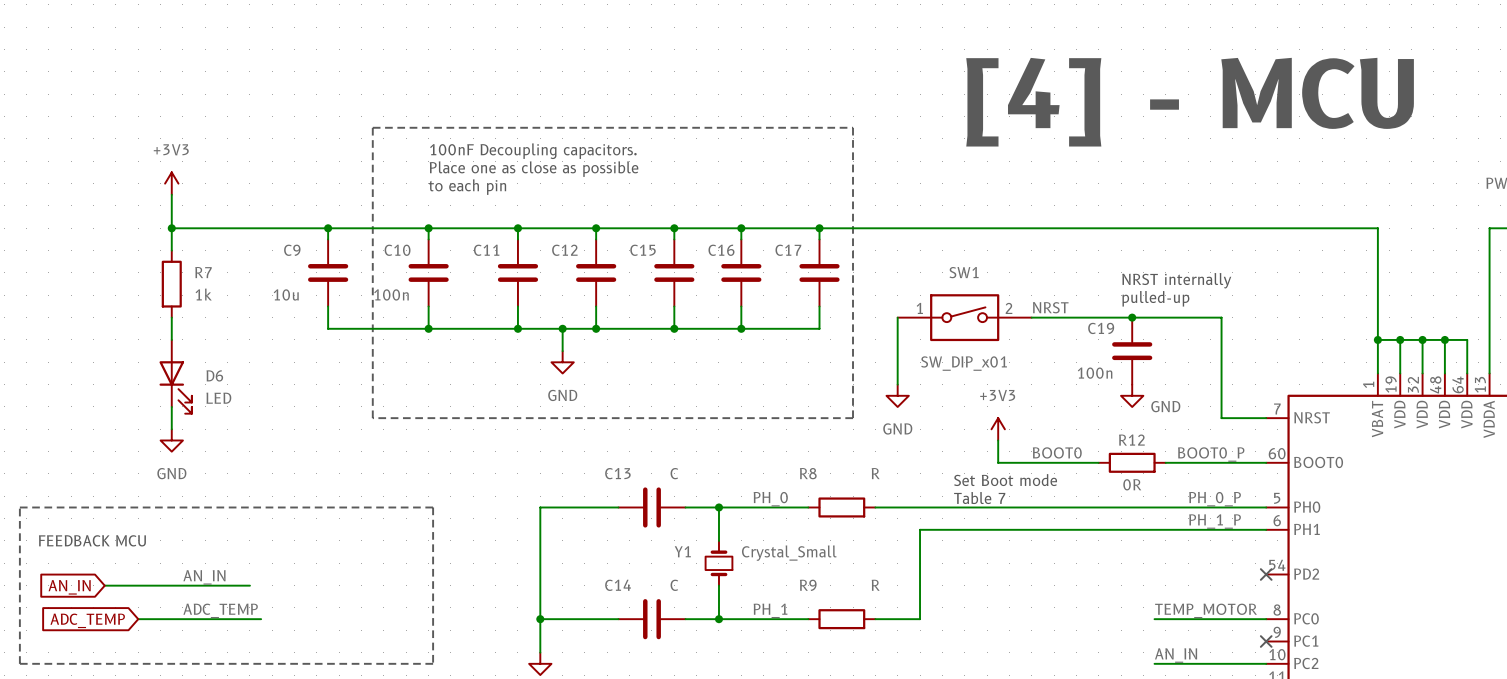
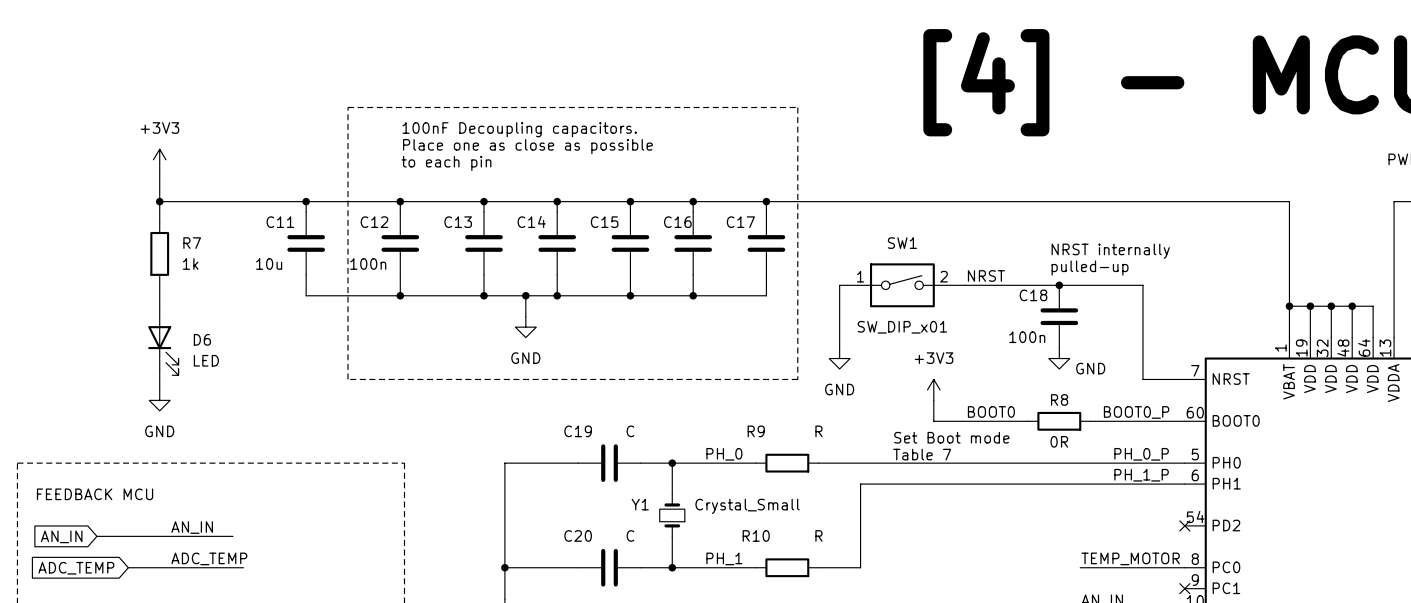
C9 name: C9 (292, 250) -> C11 (280, 222)
C10 name: C10 (397, 250) -> C12 (374, 222)
C11 name: C11 (486, 250) -> C13 (458, 222)
C12 name: C12 (564, 250) -> C14 (531, 221)
C19 name: C19 (1101, 328) -> C18 (1033, 295)
R12 name: R12 (1131, 440) -> R8 (1059, 399)
C13 name: C13 (617, 473) -> C19 (578, 431)
R8 name: R8 (808, 473) -> R9 (756, 431)
C14 name: C14 (618, 585) -> C20 (578, 535)
R9 name: R9 (808, 585) -> R10 (756, 535)

